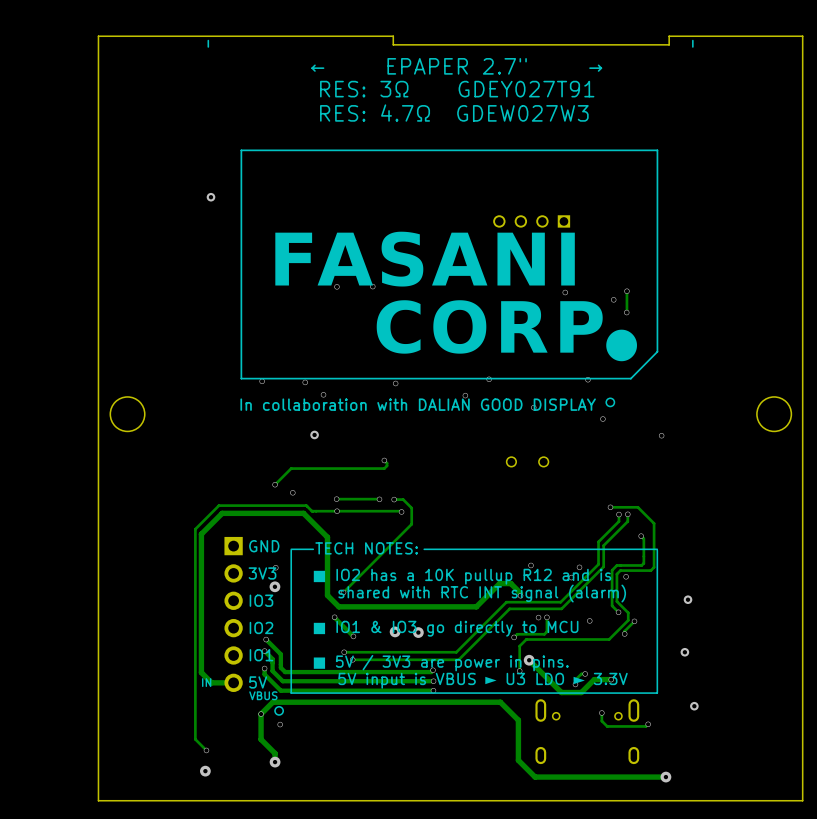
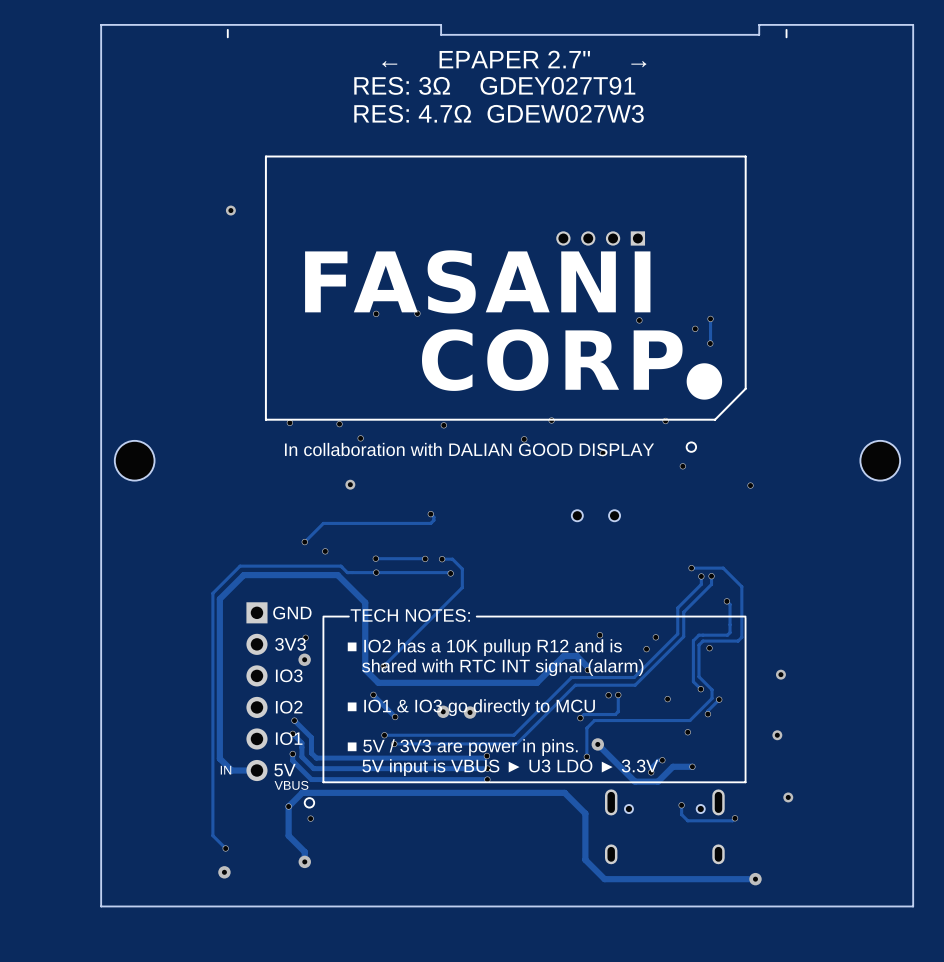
via: none -> (687, 732)

